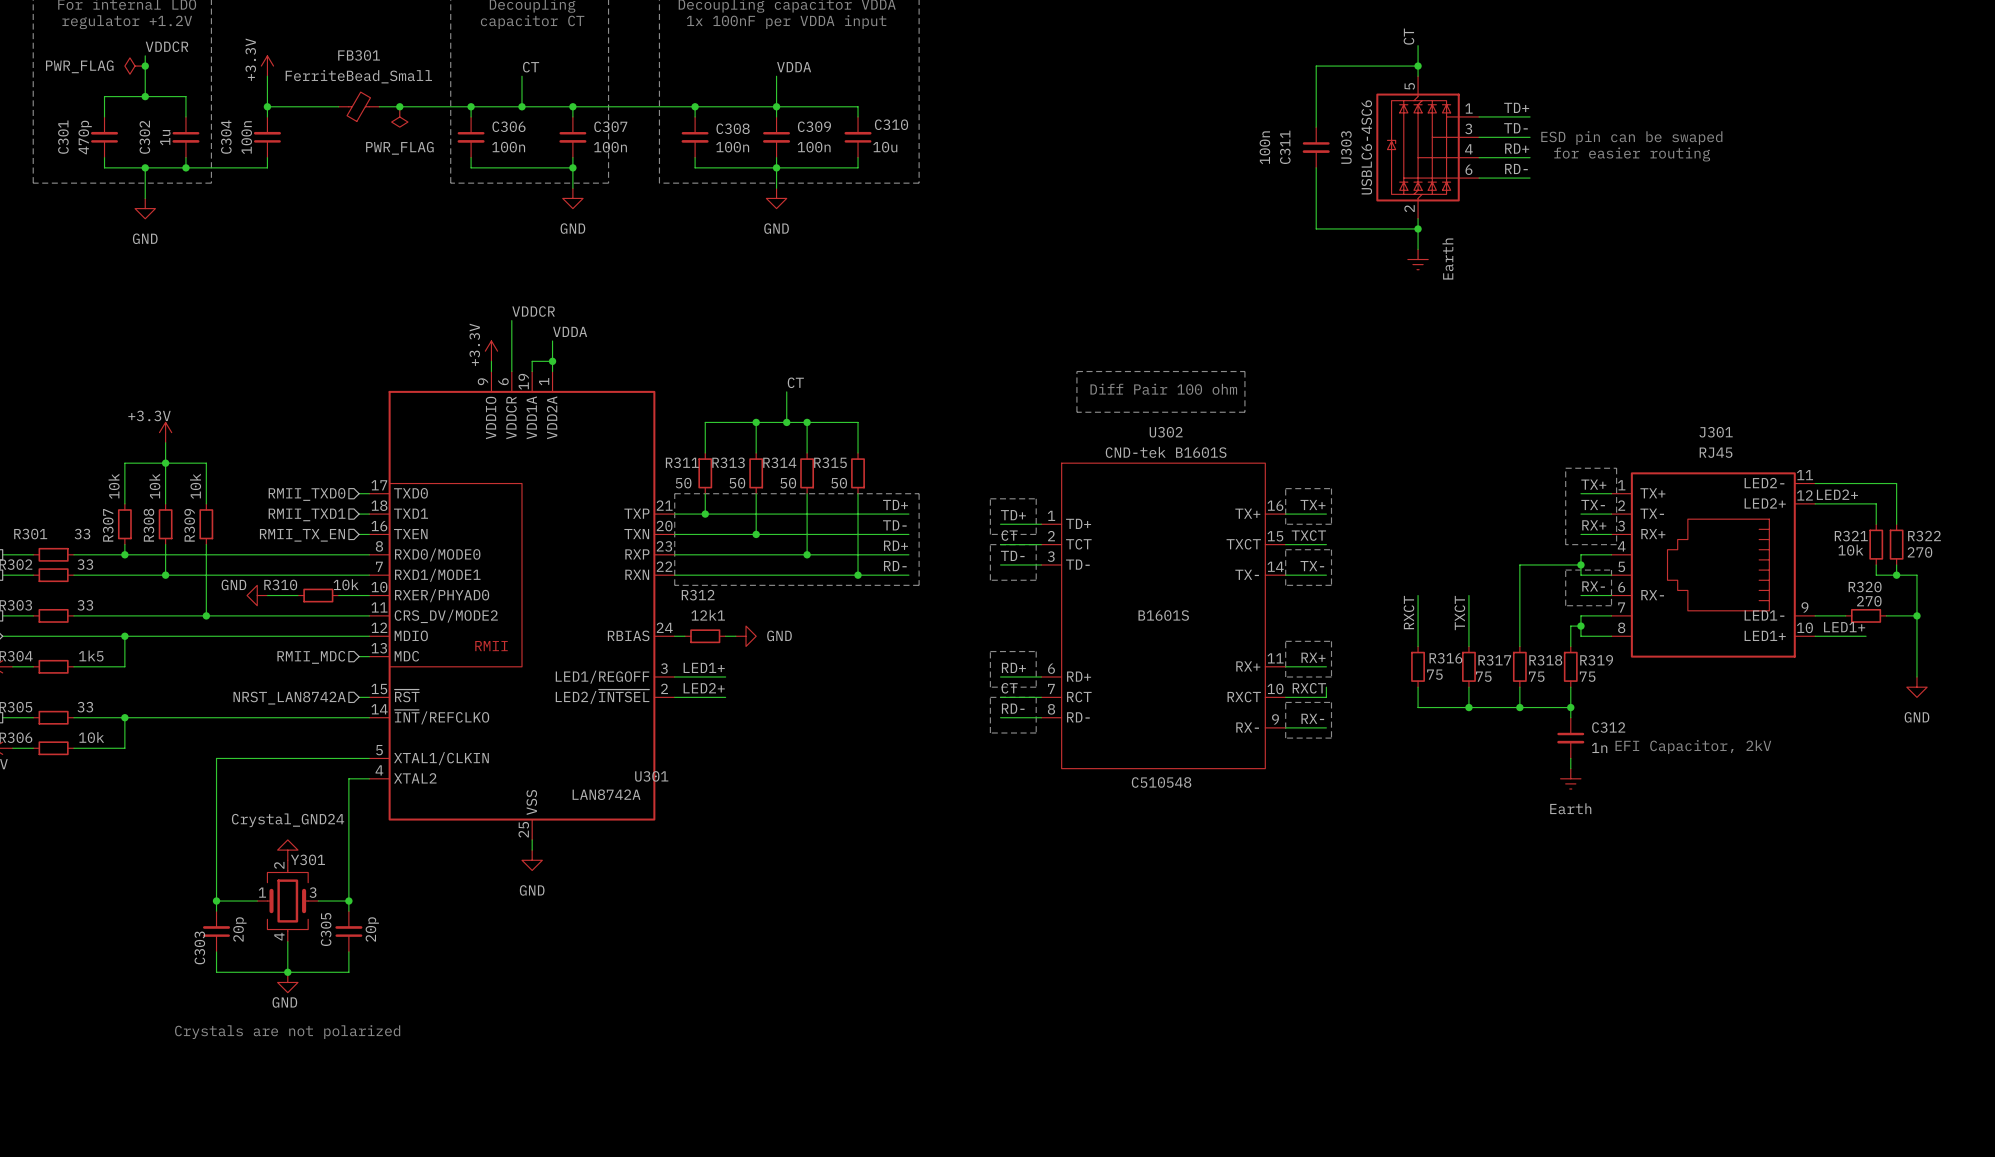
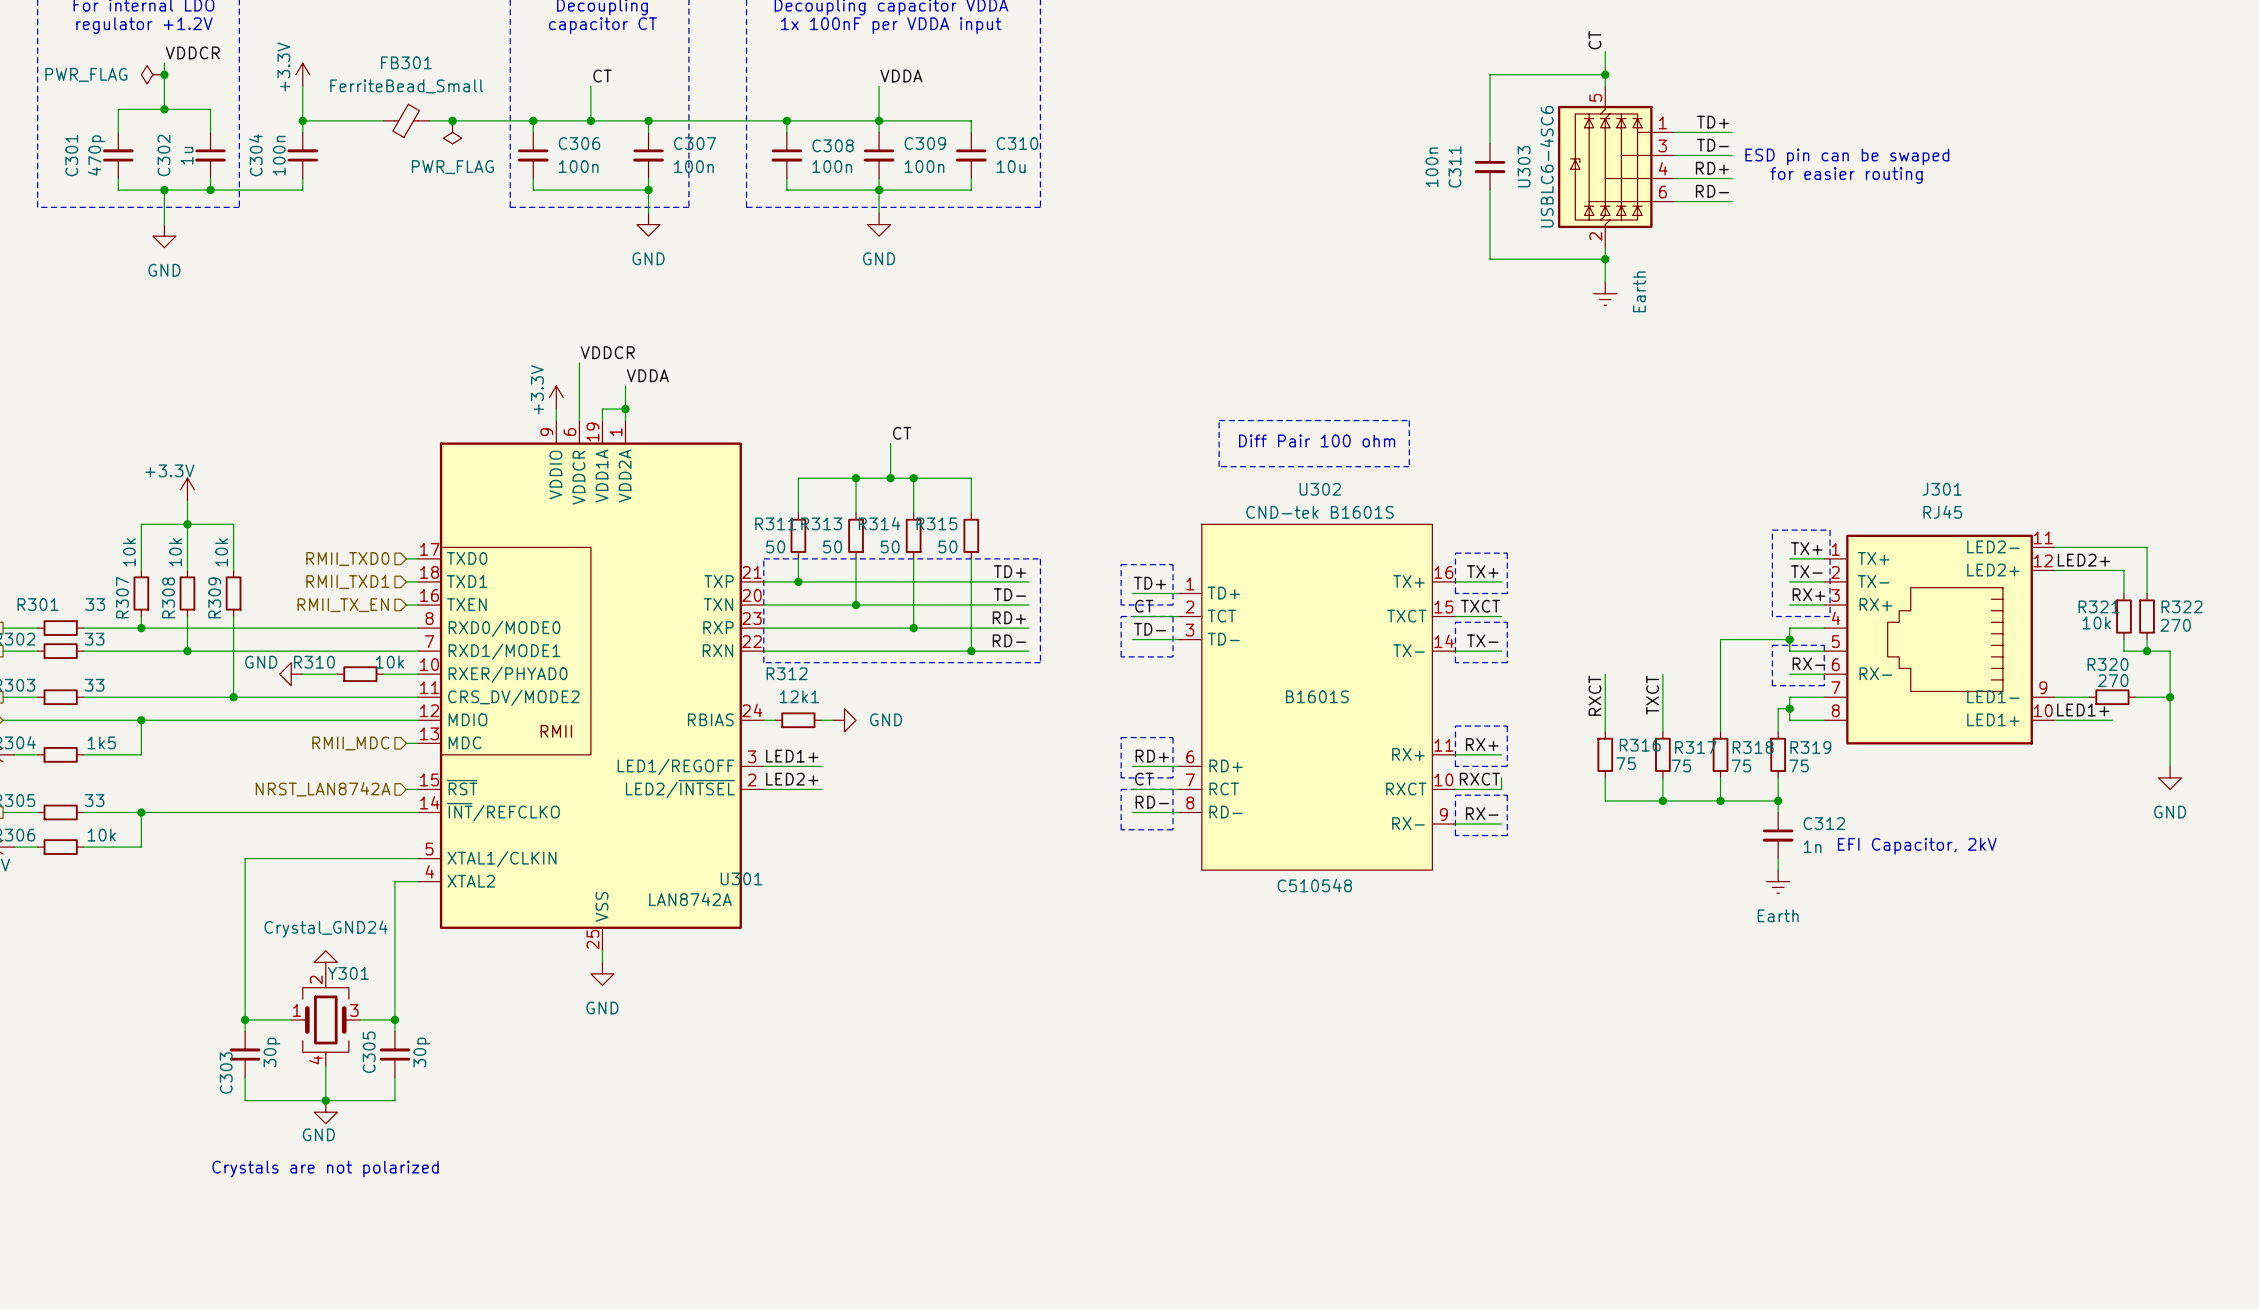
C310 rotation: 0° (858, 137) -> 180° (971, 155)
C303 value: 20p (239, 929) -> 30p (271, 1052)
C305 value: 20p (372, 929) -> 30p (421, 1052)

